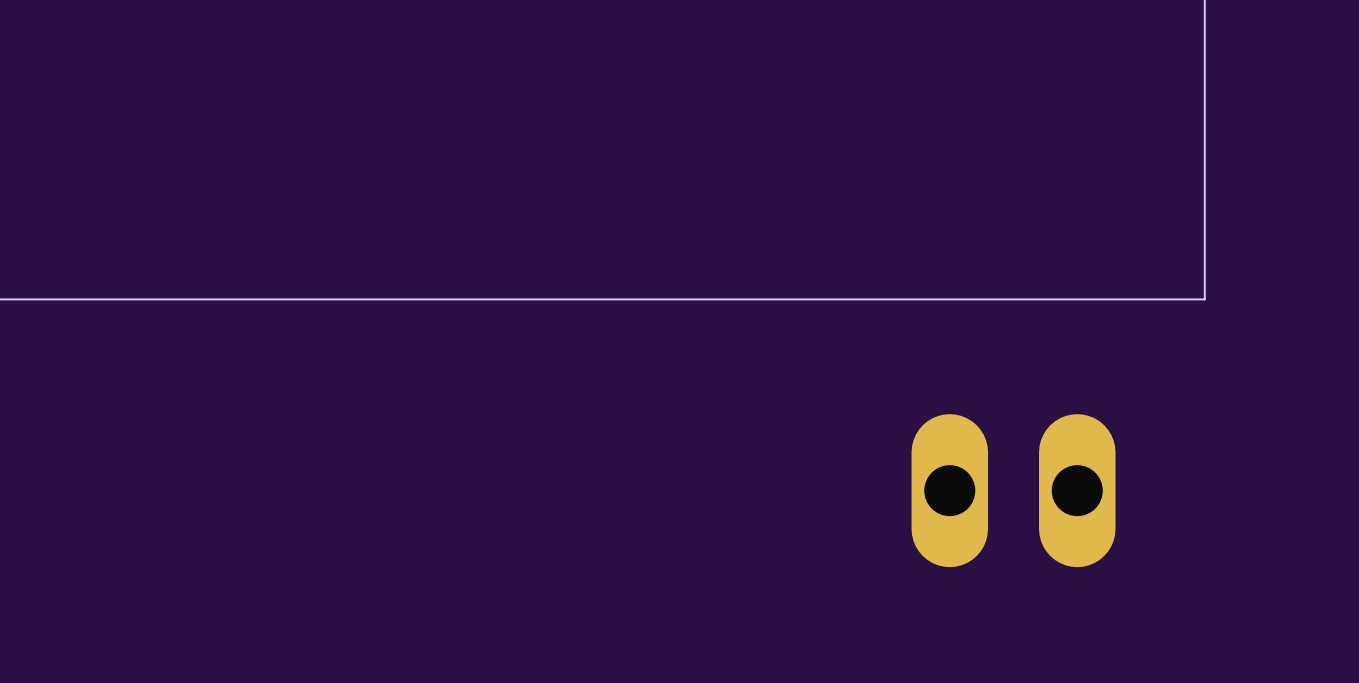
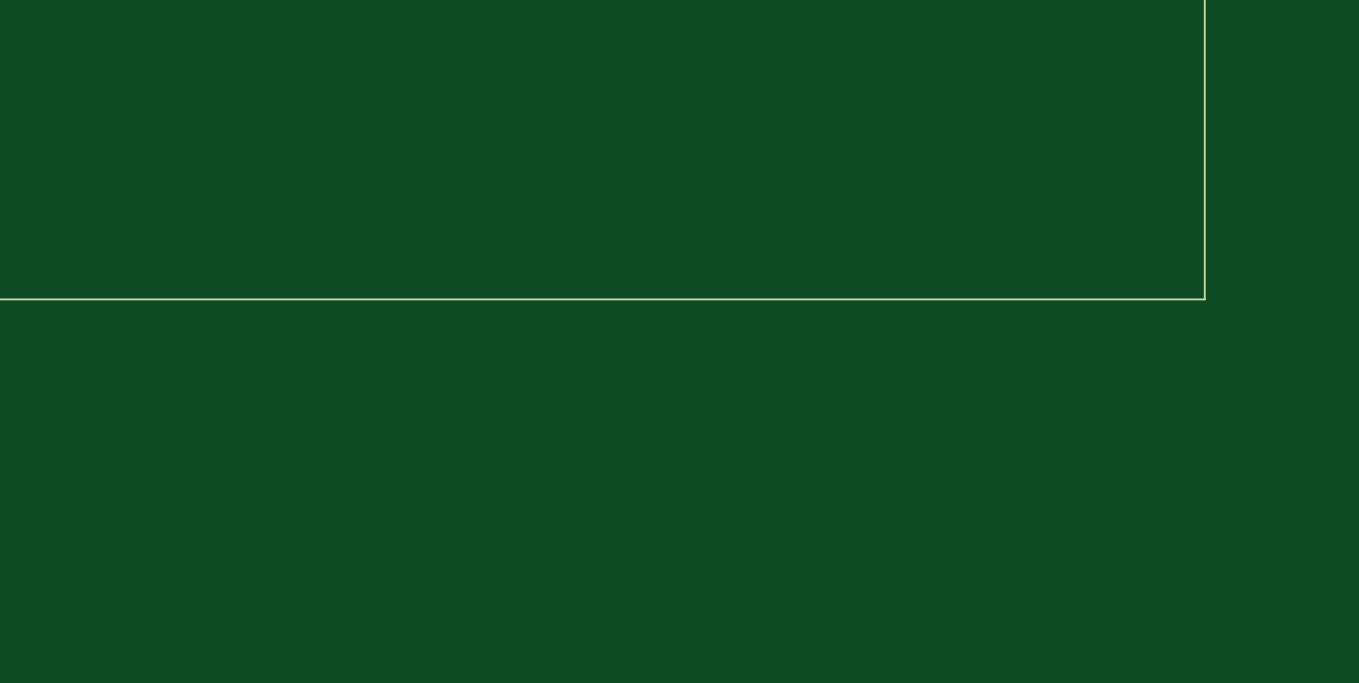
part: (1013, 490) -> none

